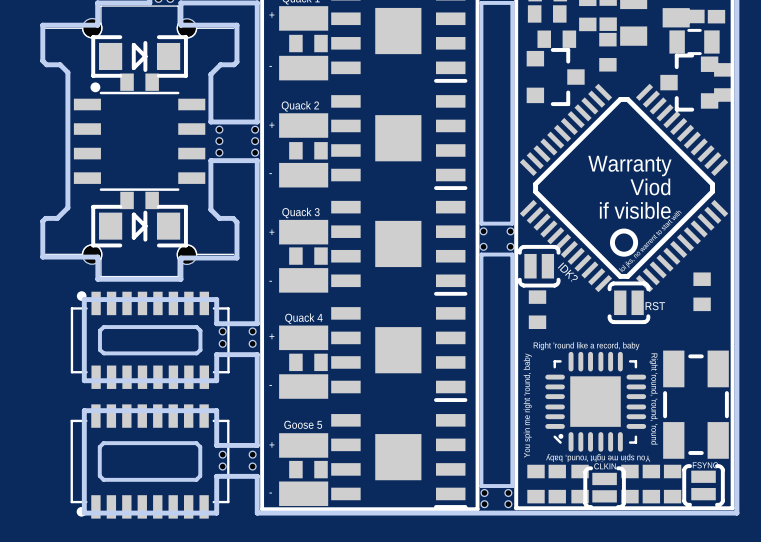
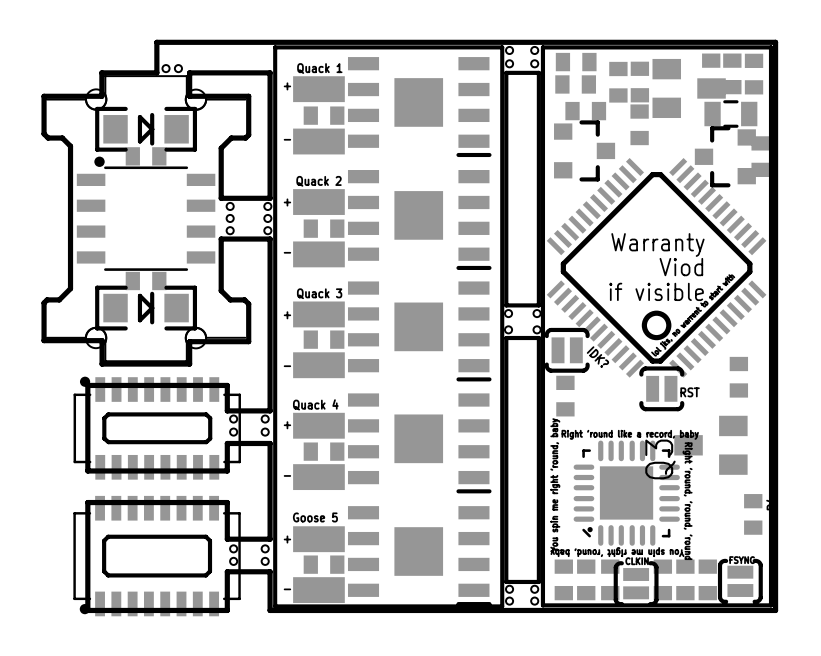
Q3: none -> (710, 445)
part: (695, 404) -> none
part: none -> (753, 514)

